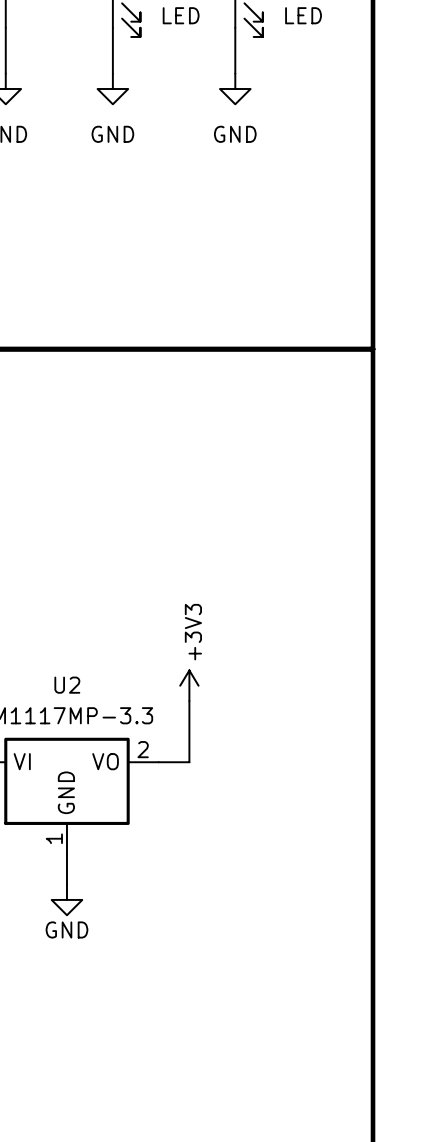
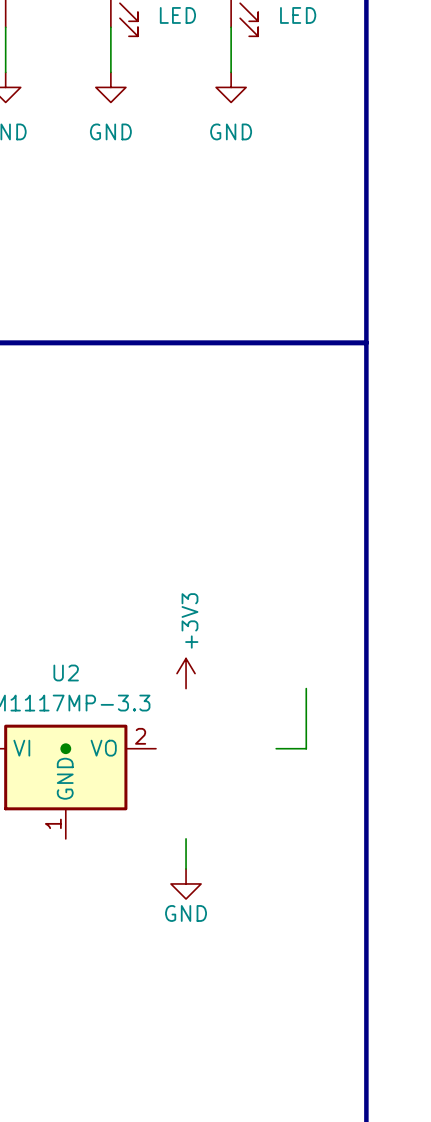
wire: (189, 701) (189, 762) (158, 762) -> (306, 688) (306, 748) (276, 748)
junction: none -> (65, 748)
wire: (66, 854) (66, 884) -> (186, 838) (186, 868)
power symbol: GND (66, 899) -> none
power symbol: none -> GND (186, 883)

